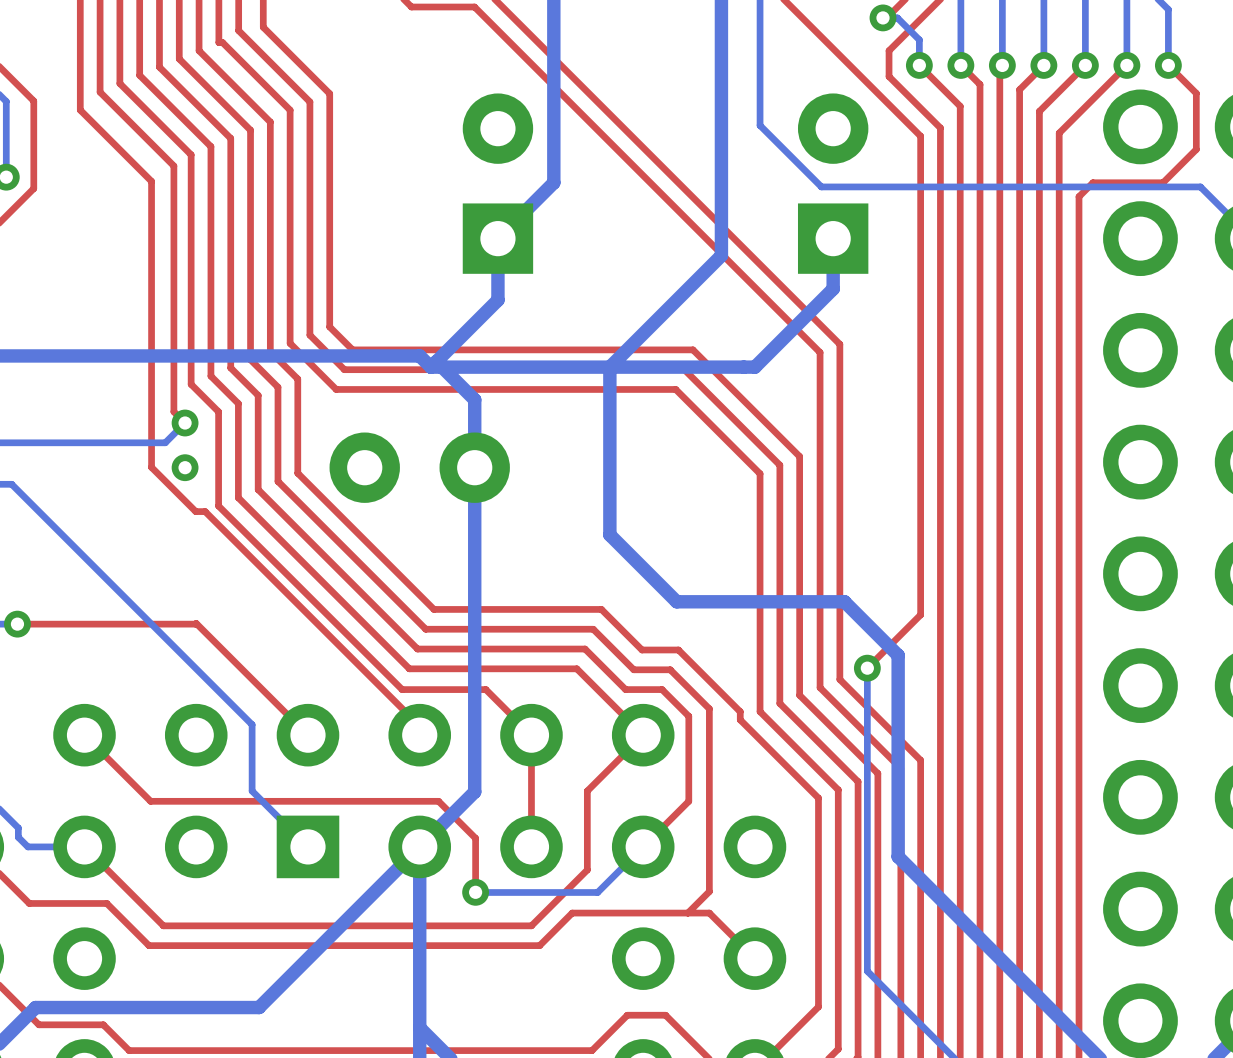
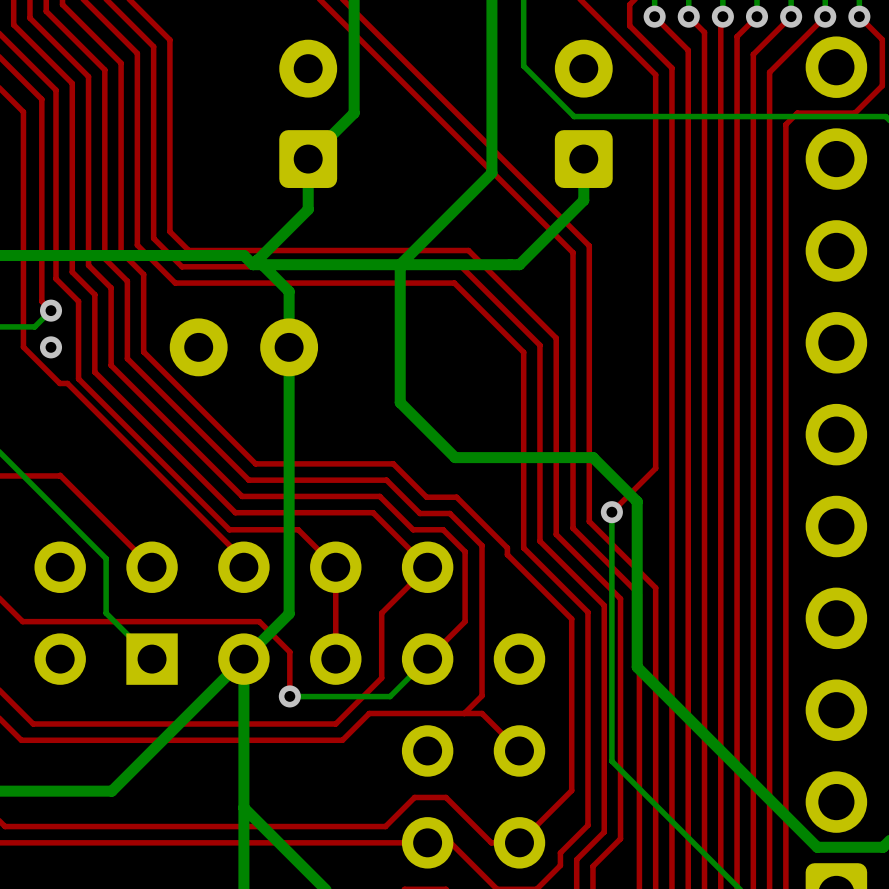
part footprint: [462, 93, 534, 274] -> [279, 39, 338, 188]
part footprint: [797, 93, 869, 274] -> [554, 39, 613, 188]

